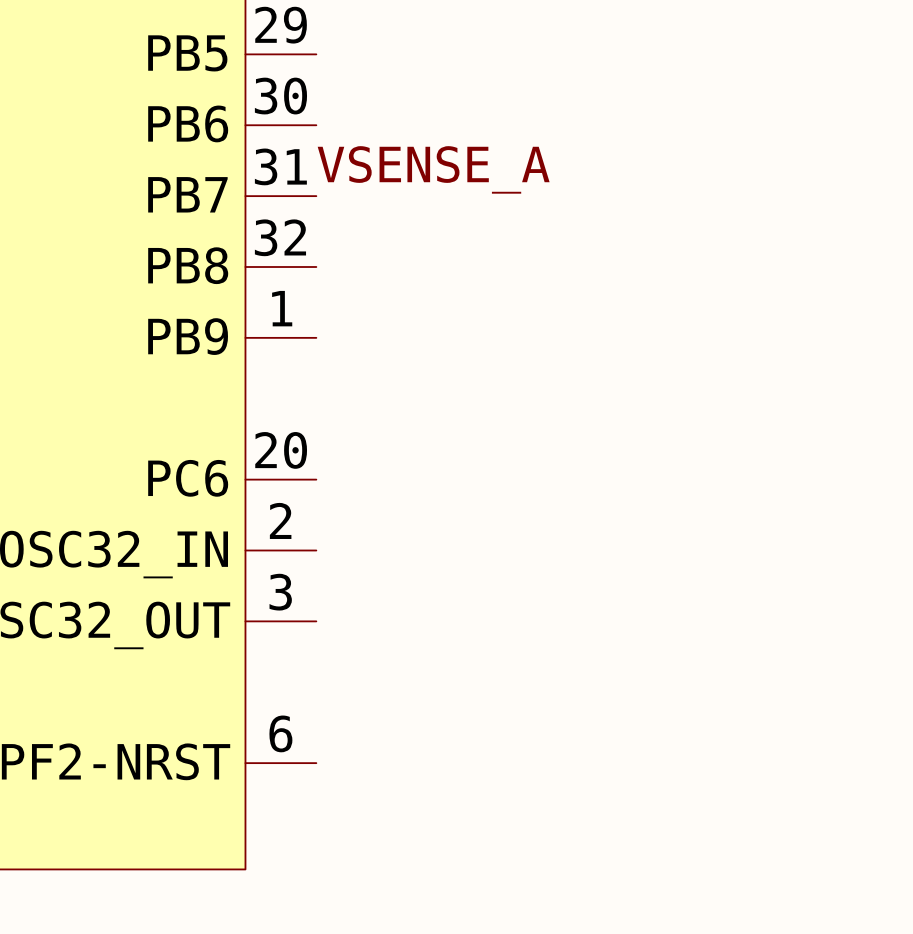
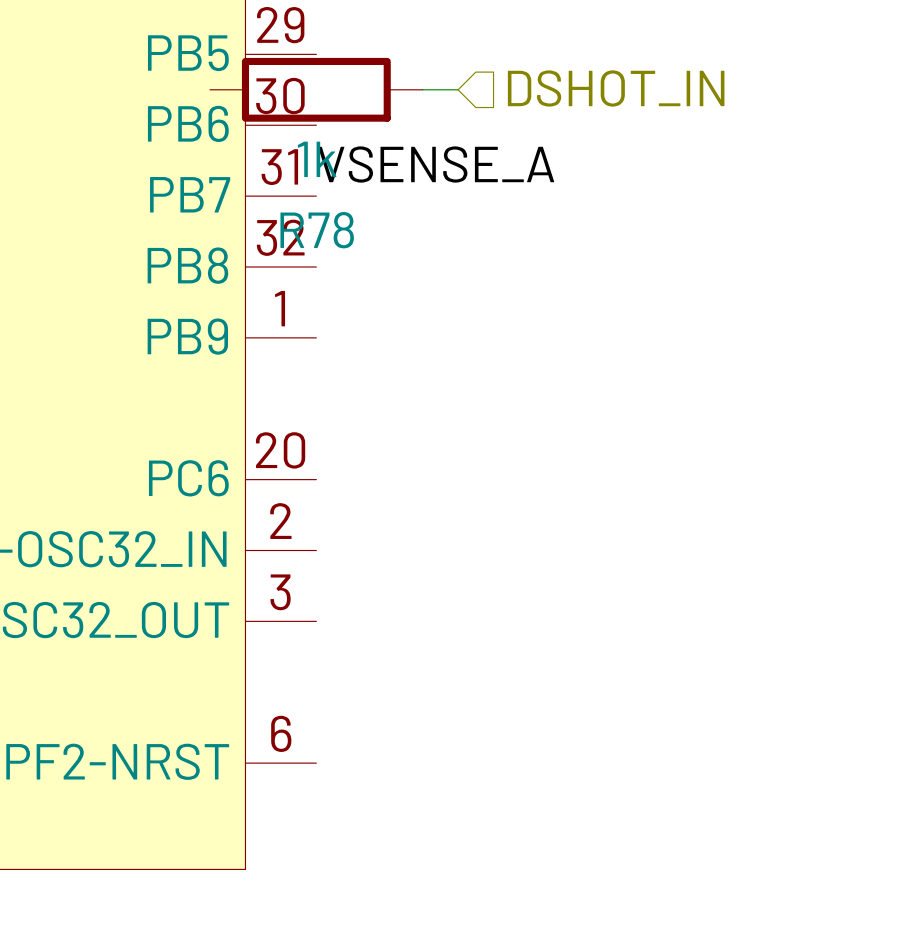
R78: none -> 1k (316, 89)
wire: none -> (422, 89) (458, 89)
hierarchical label: none -> DSHOT_IN (616, 88)

